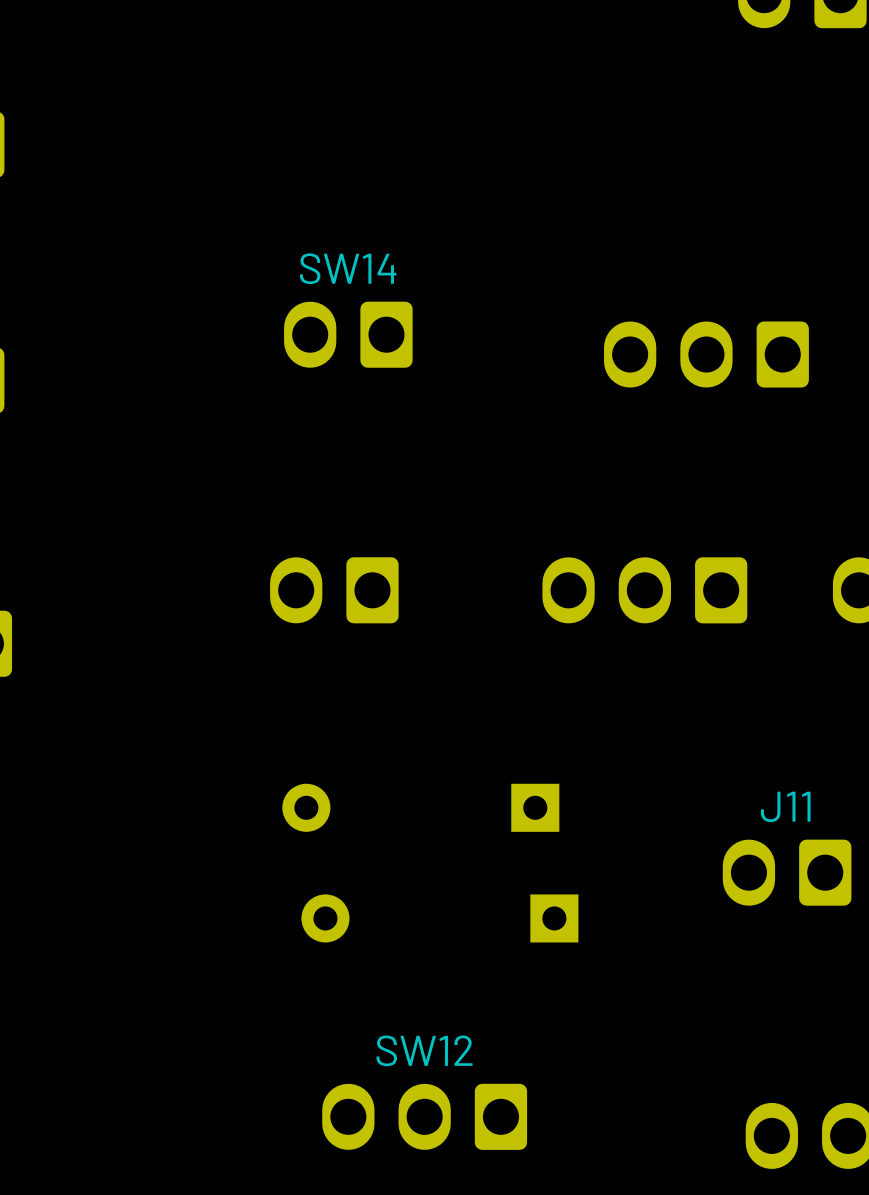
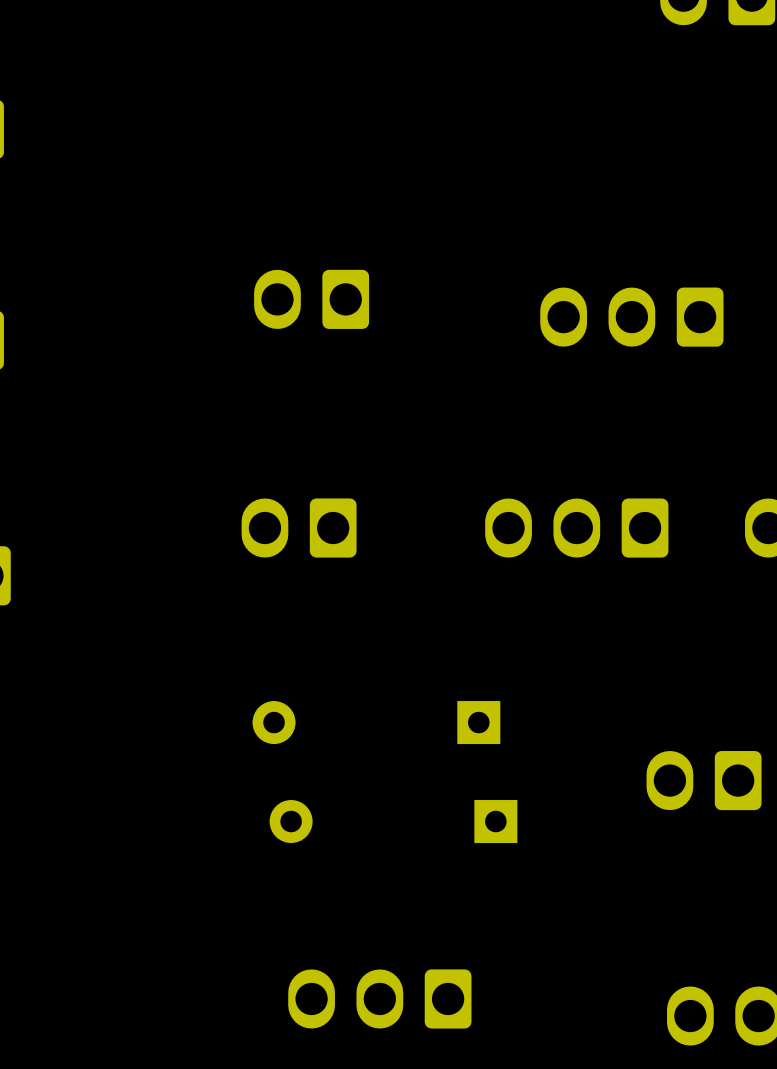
SW14 name: SW14 (348, 268) -> none
J11 name: J11 (785, 806) -> none
SW12 name: SW12 (424, 1050) -> none

